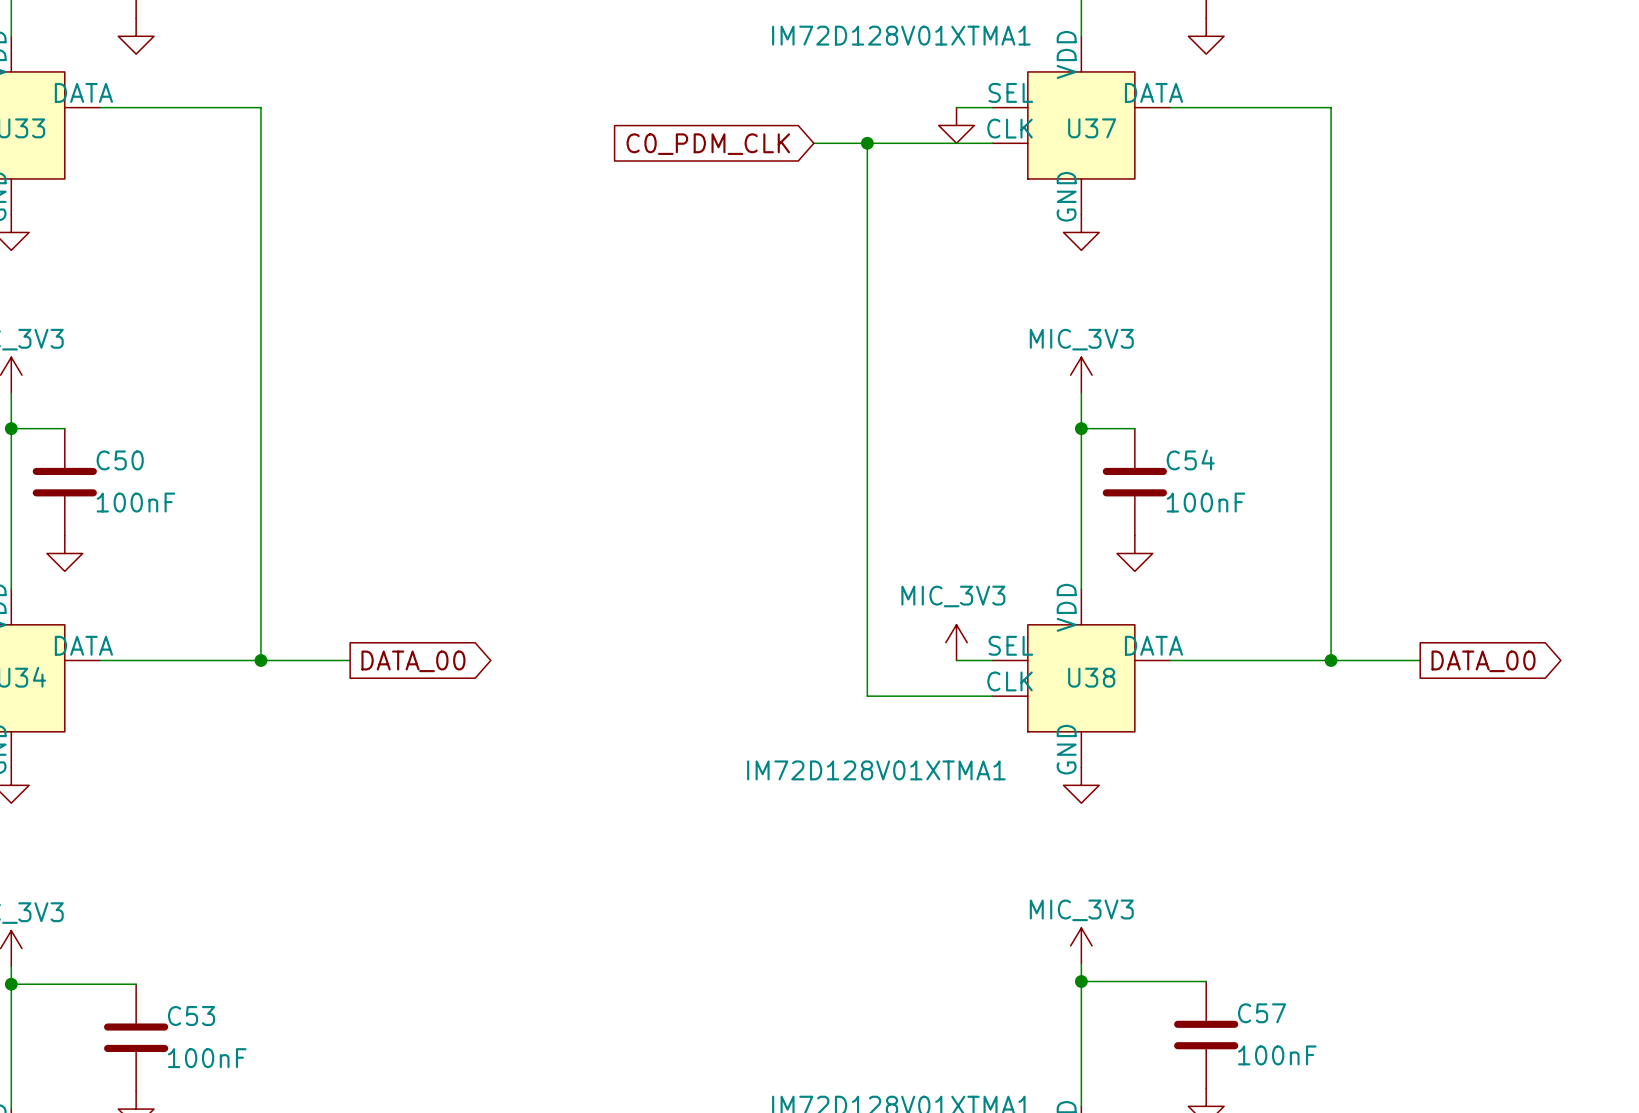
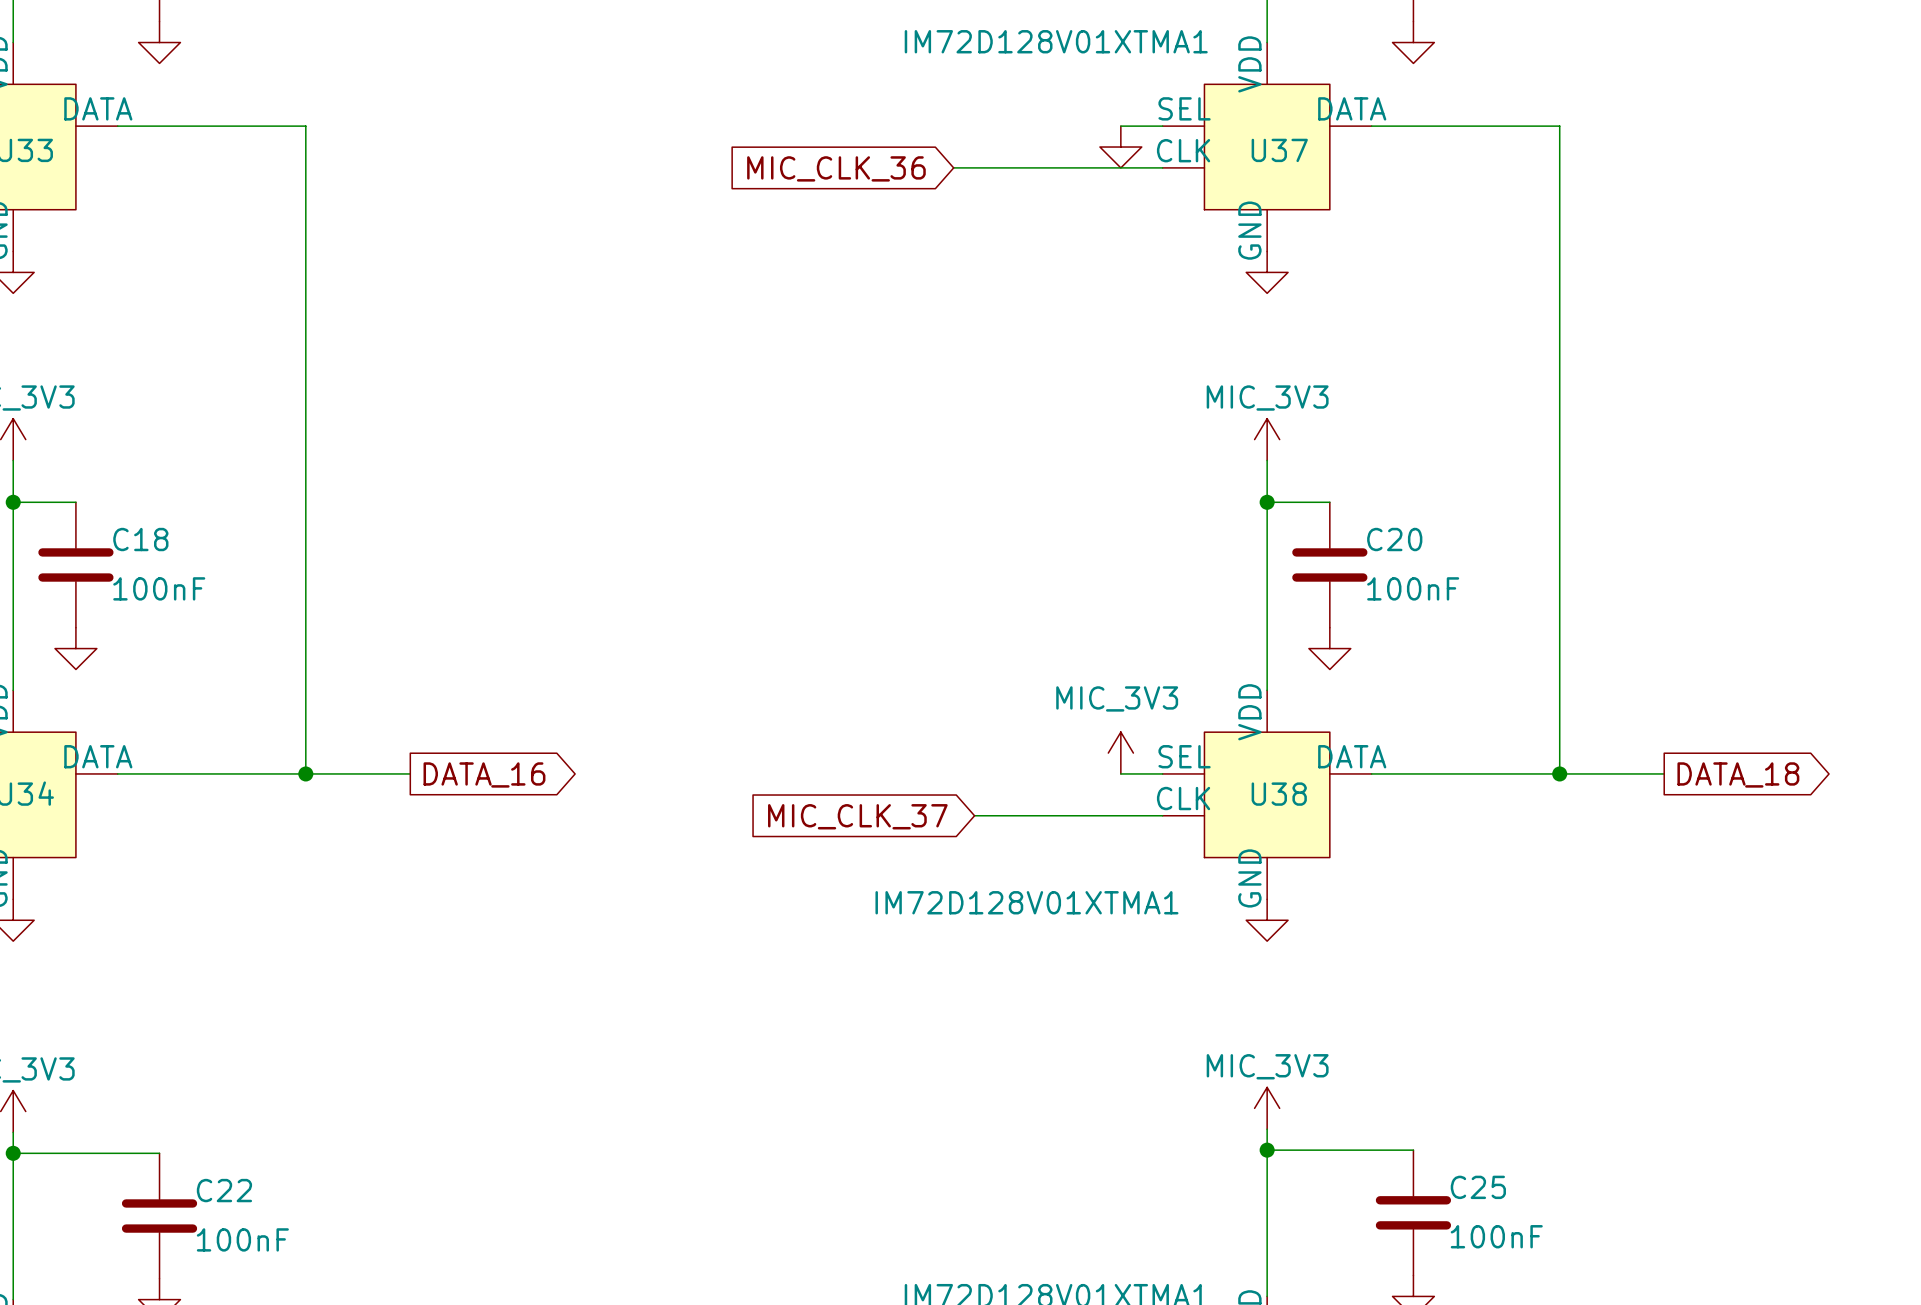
wire: (867, 143) (867, 696) -> (974, 815) (1016, 815)
junction: (867, 143) -> none
global label: C0_PDM_CLK (708, 144) -> MIC_CLK_36 (836, 168)
C54 name: C54 (1190, 459) -> C20 (1394, 539)
C50 name: C50 (120, 460) -> C18 (140, 539)
global label: DATA_00 (413, 661) -> DATA_16 (484, 774)
global label: DATA_00 (1483, 661) -> DATA_18 (1738, 774)
global label: none -> MIC_CLK_37 (857, 816)
C57 name: C57 (1262, 1013) -> C25 (1478, 1187)
C53 name: C53 (191, 1016) -> C22 (224, 1190)

